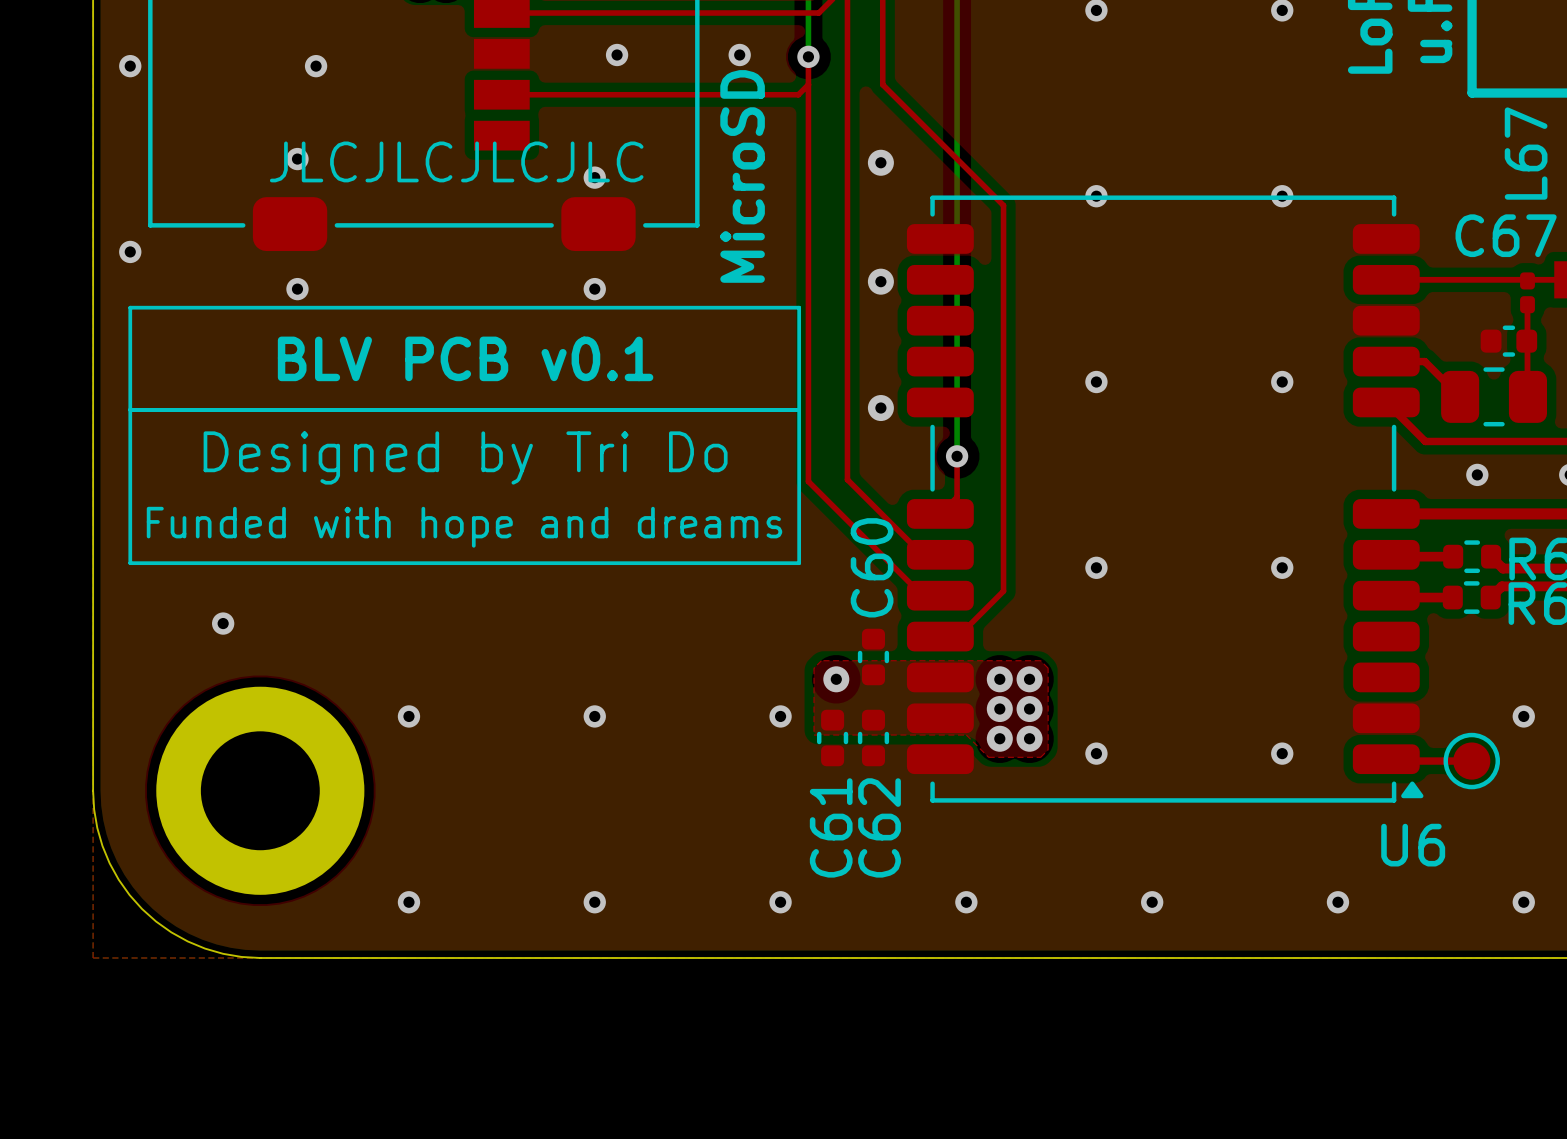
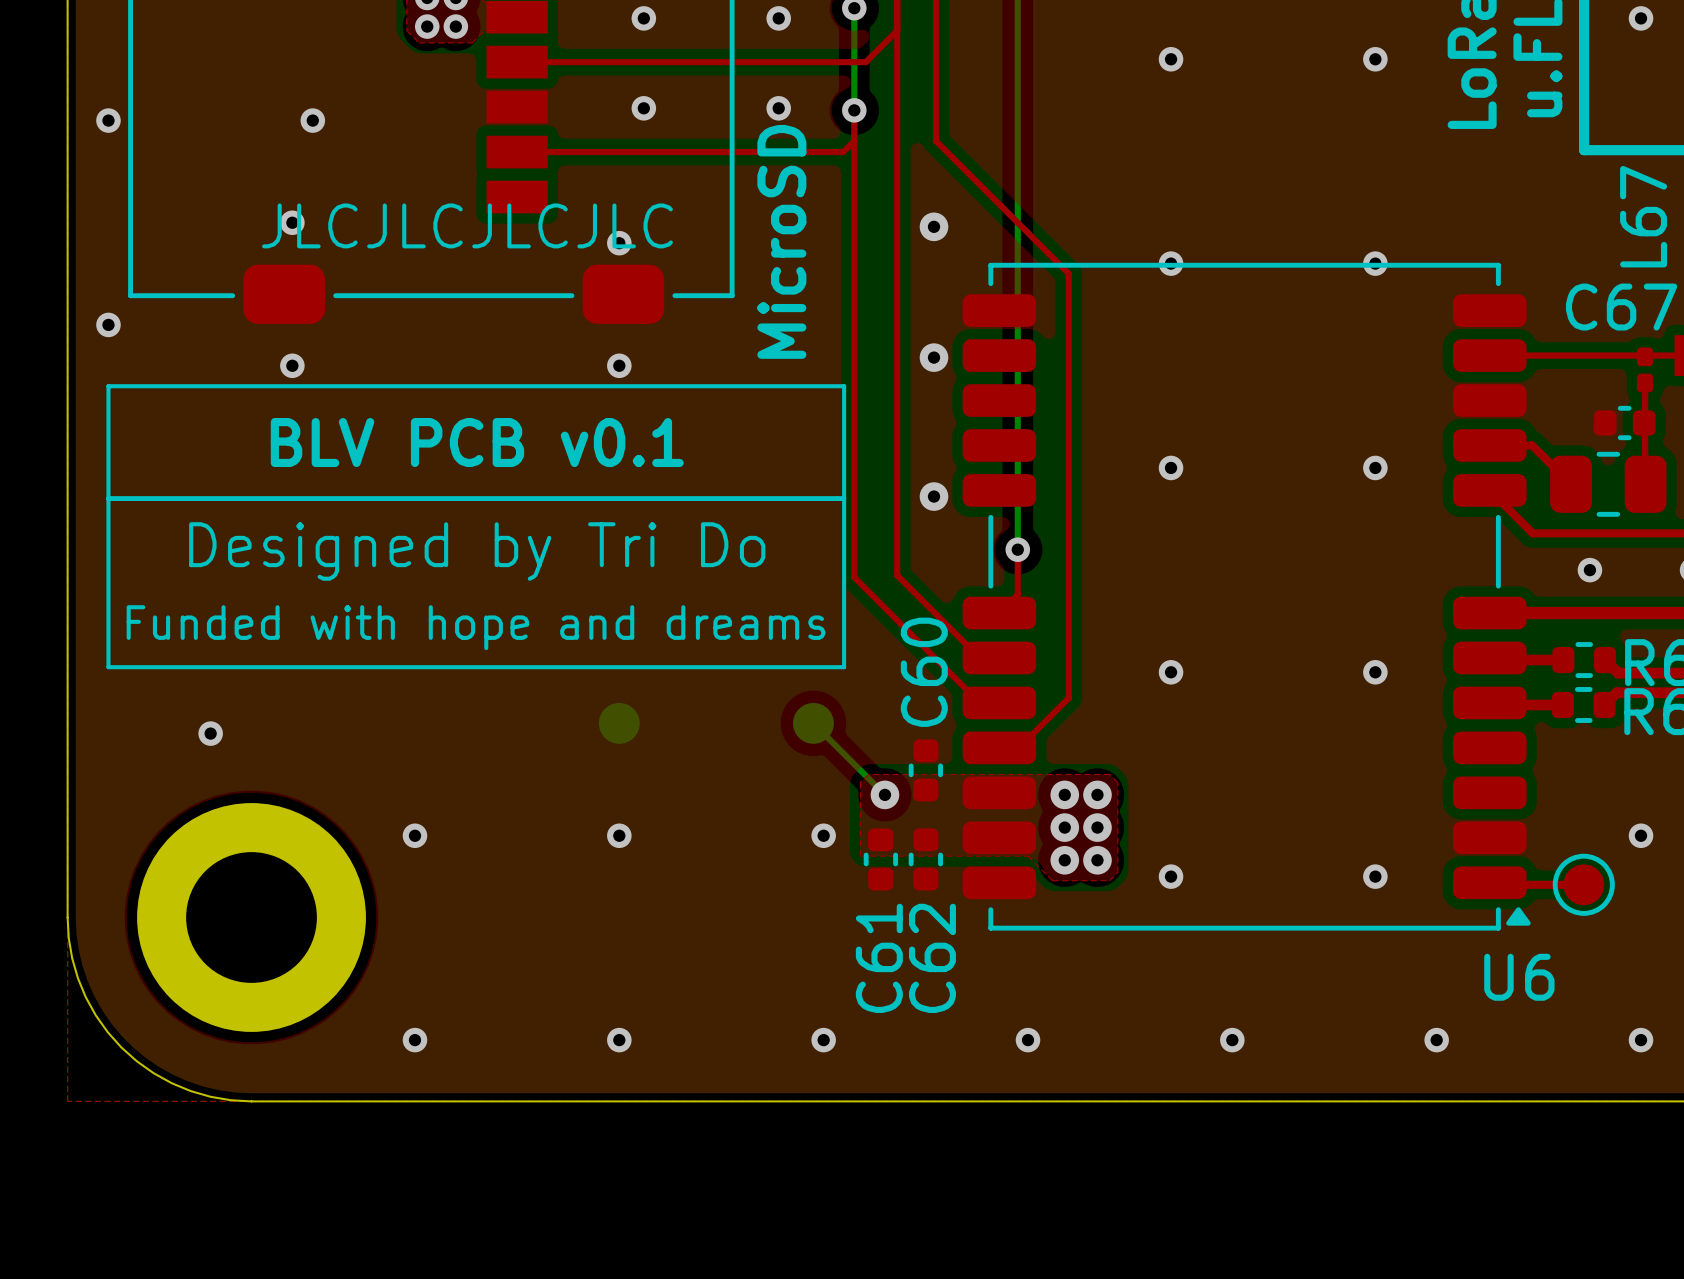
part: none -> (619, 723)
bottom track: none -> (813, 723) (884, 794)
part: none -> (813, 723)

